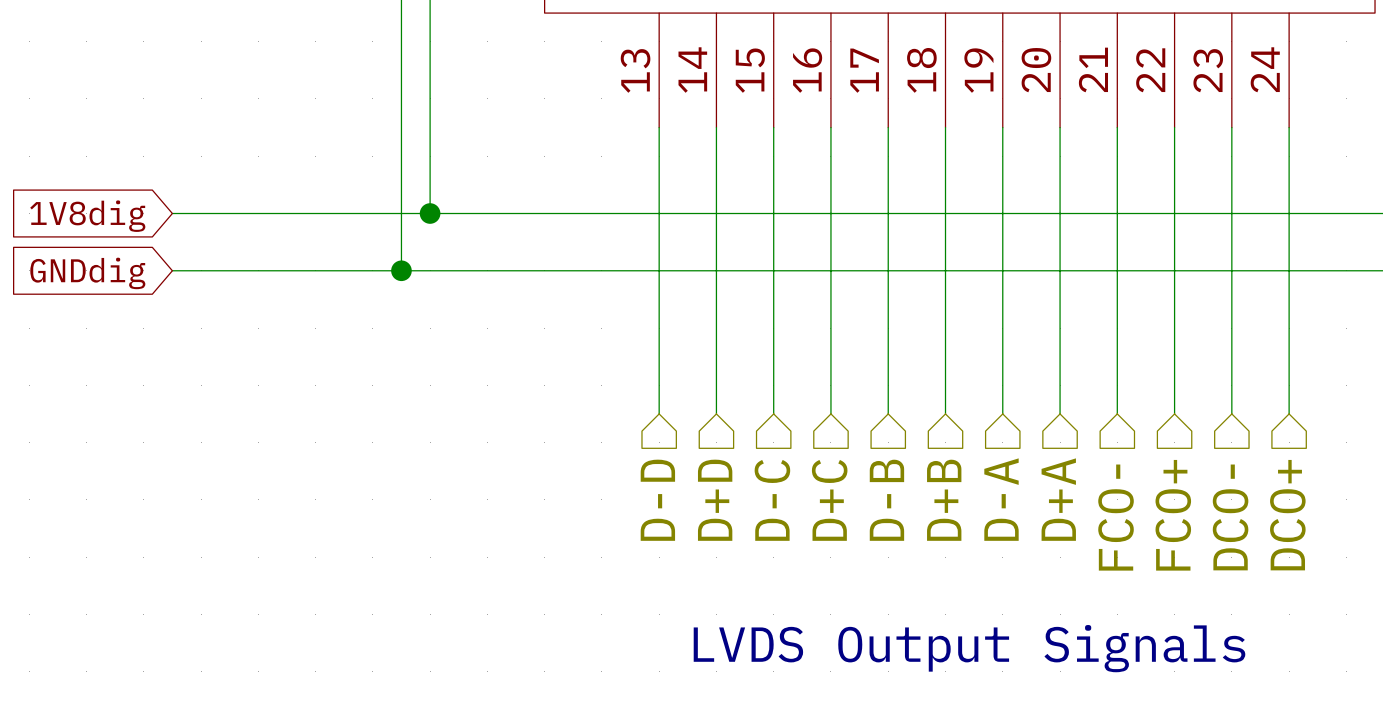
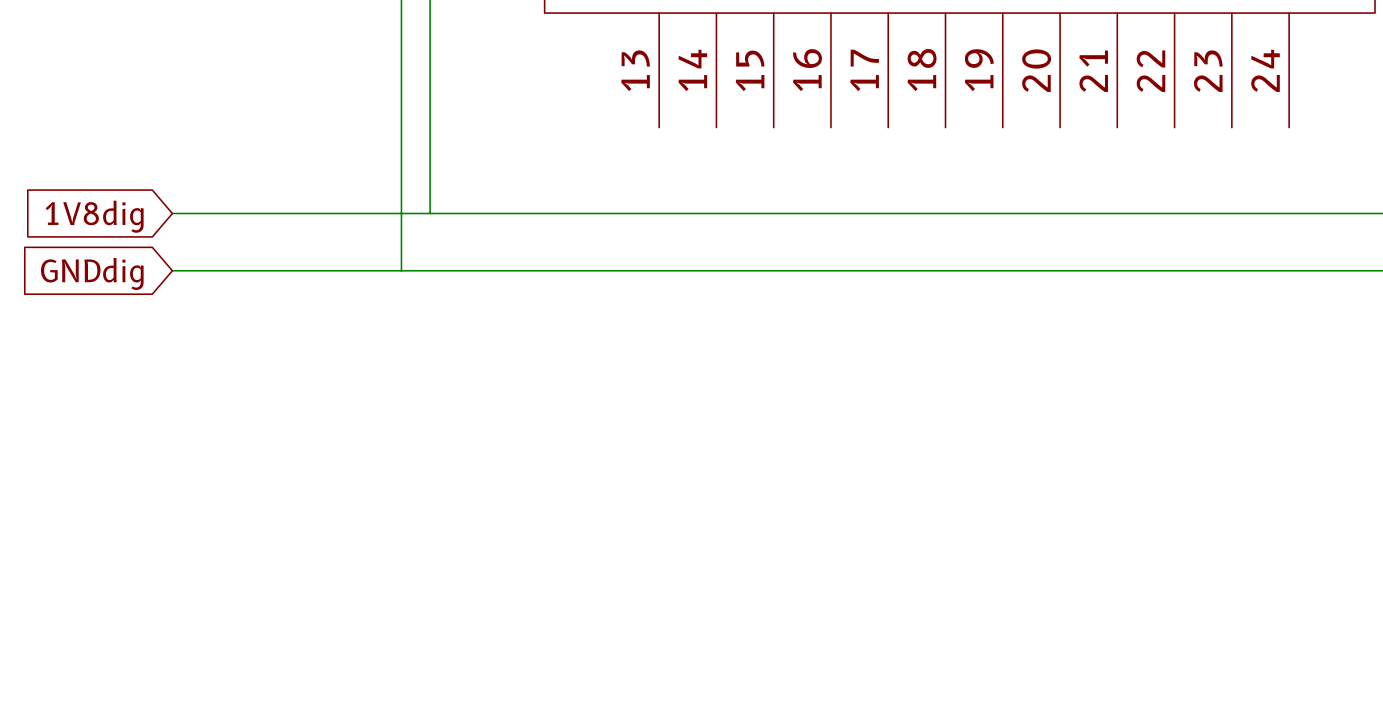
wire: (659, 127) (659, 413) -> none
wire: (716, 127) (716, 413) -> none
wire: (773, 127) (773, 413) -> none
wire: (830, 127) (830, 413) -> none
wire: (888, 127) (888, 413) -> none
wire: (945, 127) (945, 413) -> none
wire: (1002, 127) (1002, 413) -> none
wire: (1060, 127) (1060, 413) -> none
wire: (1117, 127) (1117, 413) -> none
wire: (1174, 127) (1174, 413) -> none
wire: (1231, 127) (1231, 413) -> none
wire: (1289, 127) (1289, 413) -> none
junction: (430, 213) -> none
junction: (401, 270) -> none
hierarchical label: D-A (1001, 499) -> none
hierarchical label: D+A (1058, 499) -> none
hierarchical label: D-D (657, 500) -> none
hierarchical label: D+D (715, 500) -> none
hierarchical label: D-C (772, 500) -> none
hierarchical label: D+C (829, 500) -> none
hierarchical label: D-B (886, 500) -> none
hierarchical label: D+B (944, 500) -> none
hierarchical label: FCO+ (1173, 515) -> none
hierarchical label: DCO+ (1287, 515) -> none
hierarchical label: FCO- (1116, 517) -> none
hierarchical label: DCO- (1230, 517) -> none
text: LVDS Output Signals (969, 648) -> none

